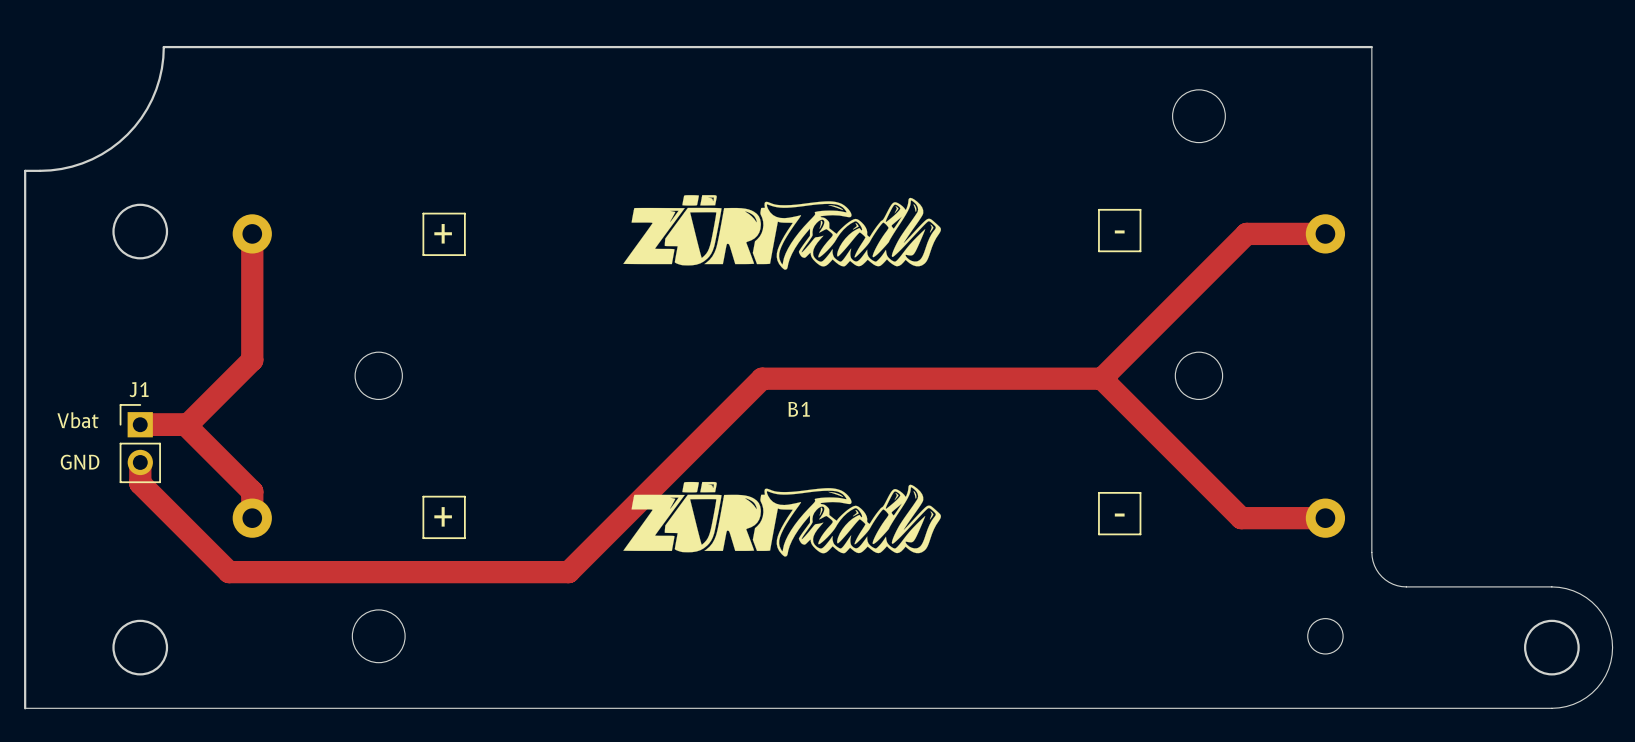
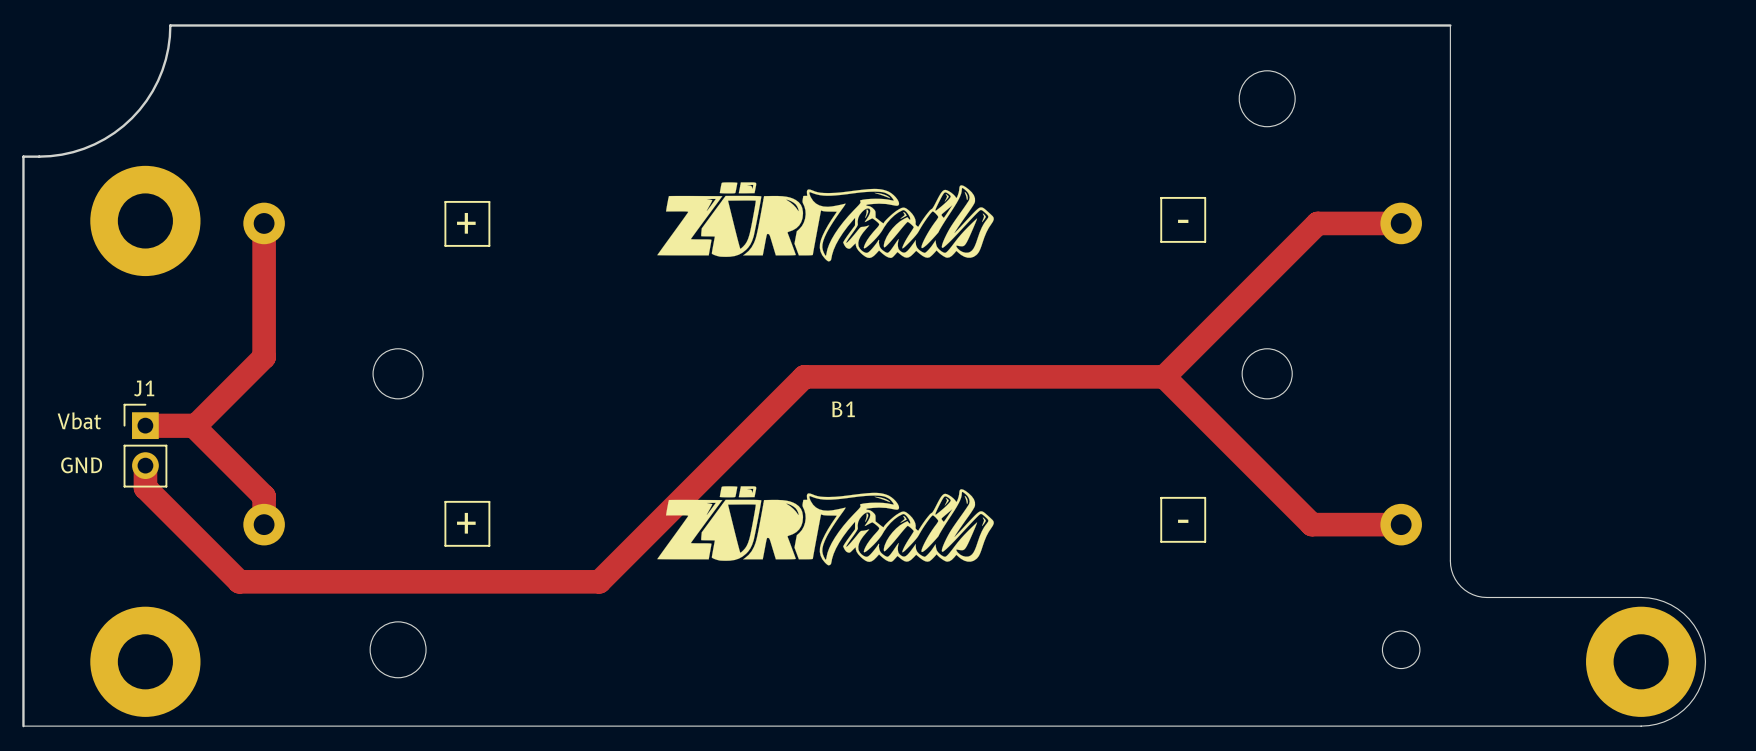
round board edge: [112, 203, 169, 260] -> none
part: none -> (145, 220)
round board edge: [112, 619, 169, 676] -> none
round board edge: [1524, 619, 1580, 676] -> none
part: none -> (145, 661)
part: none -> (1641, 661)

